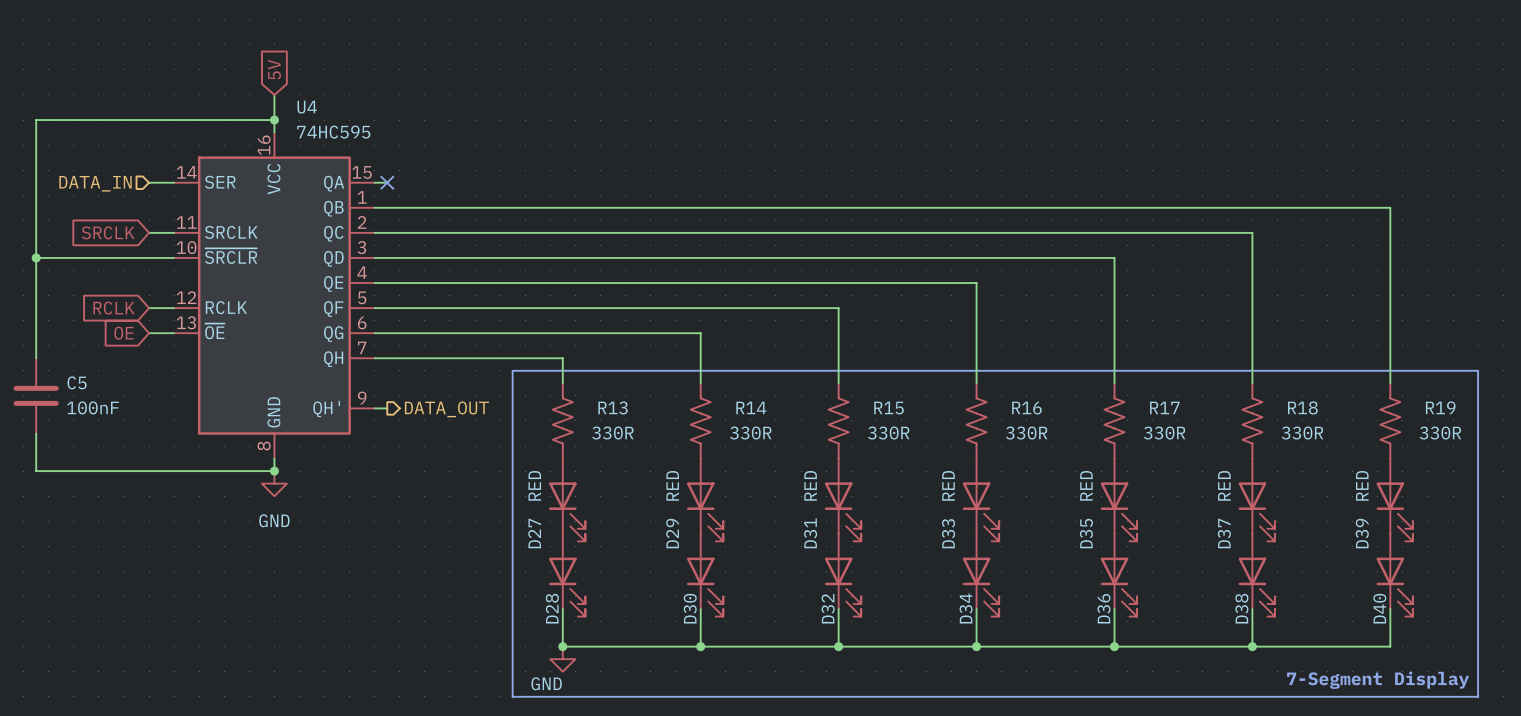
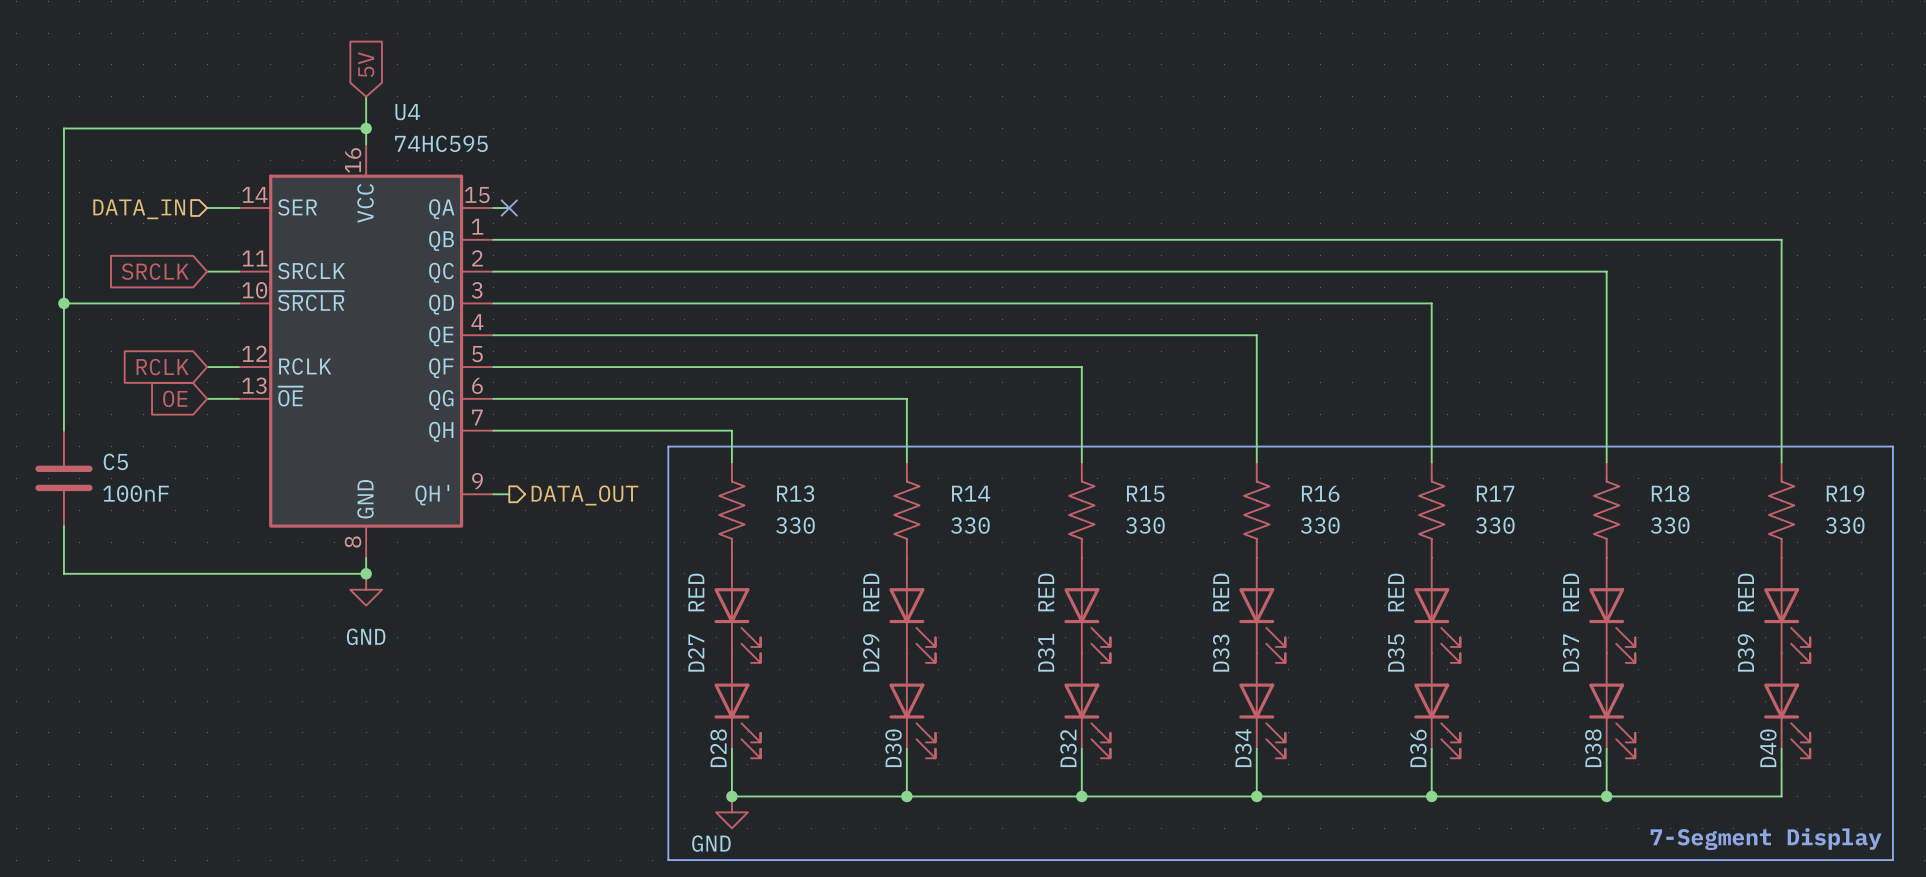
R13 value: 330R (612, 433) -> 330 (795, 525)
R14 value: 330R (750, 433) -> 330 (970, 525)
R15 value: 330R (888, 433) -> 330 (1145, 525)
R16 value: 330R (1026, 433) -> 330 (1320, 525)
R17 value: 330R (1164, 433) -> 330 (1495, 525)
R18 value: 330R (1302, 433) -> 330 (1670, 525)
R19 value: 330R (1440, 433) -> 330 (1845, 525)

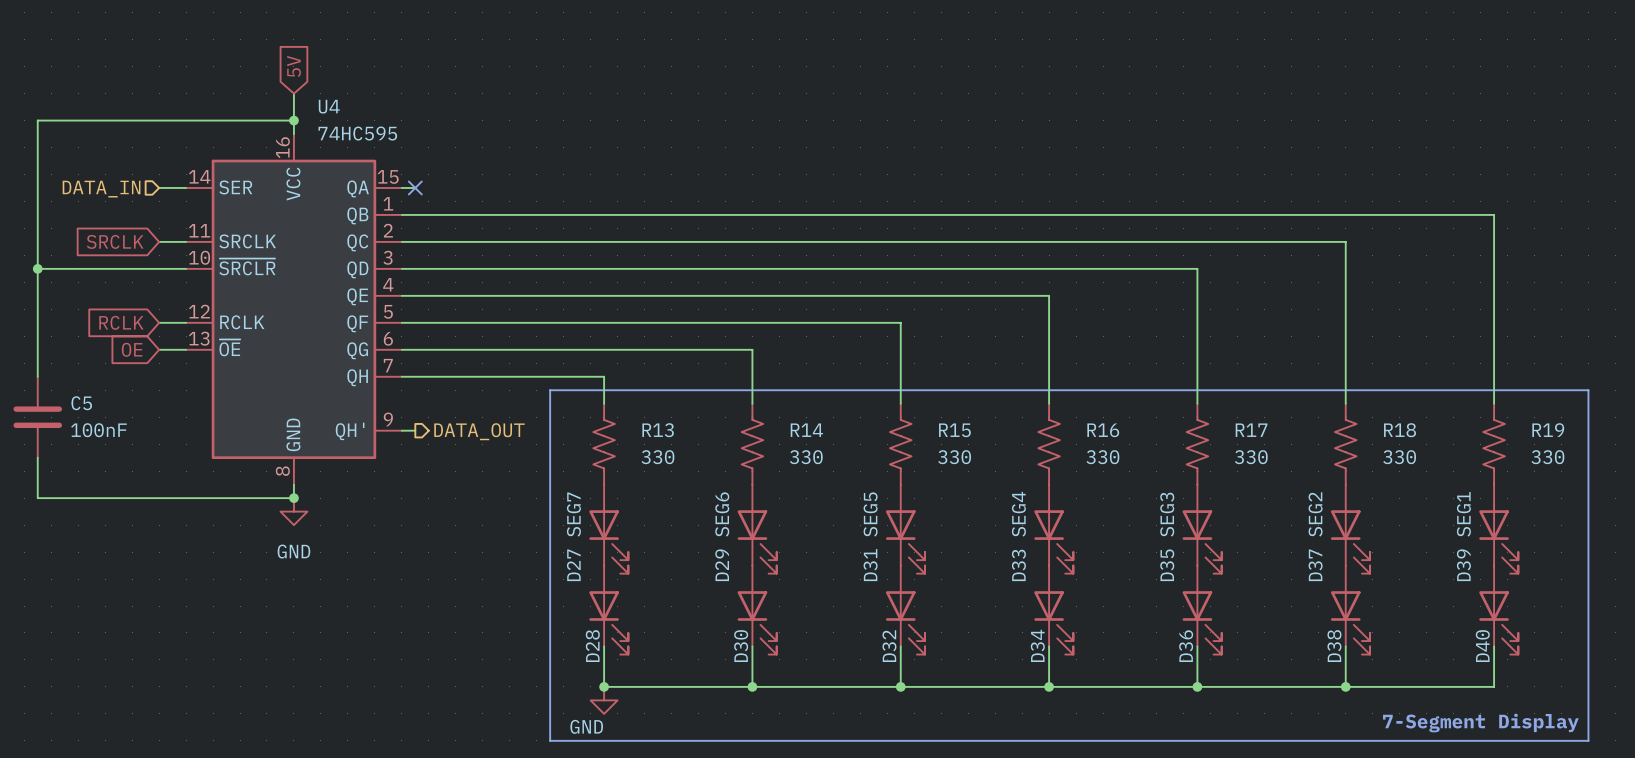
D27 value: RED (696, 592) -> SEG7 (573, 514)
D29 value: RED (871, 592) -> SEG6 (722, 514)
D31 value: RED (1046, 592) -> SEG5 (870, 514)
D33 value: RED (1221, 592) -> SEG4 (1018, 514)
D35 value: RED (1396, 592) -> SEG3 (1167, 514)
D37 value: RED (1571, 592) -> SEG2 (1315, 514)
D39 value: RED (1746, 592) -> SEG1 (1463, 514)

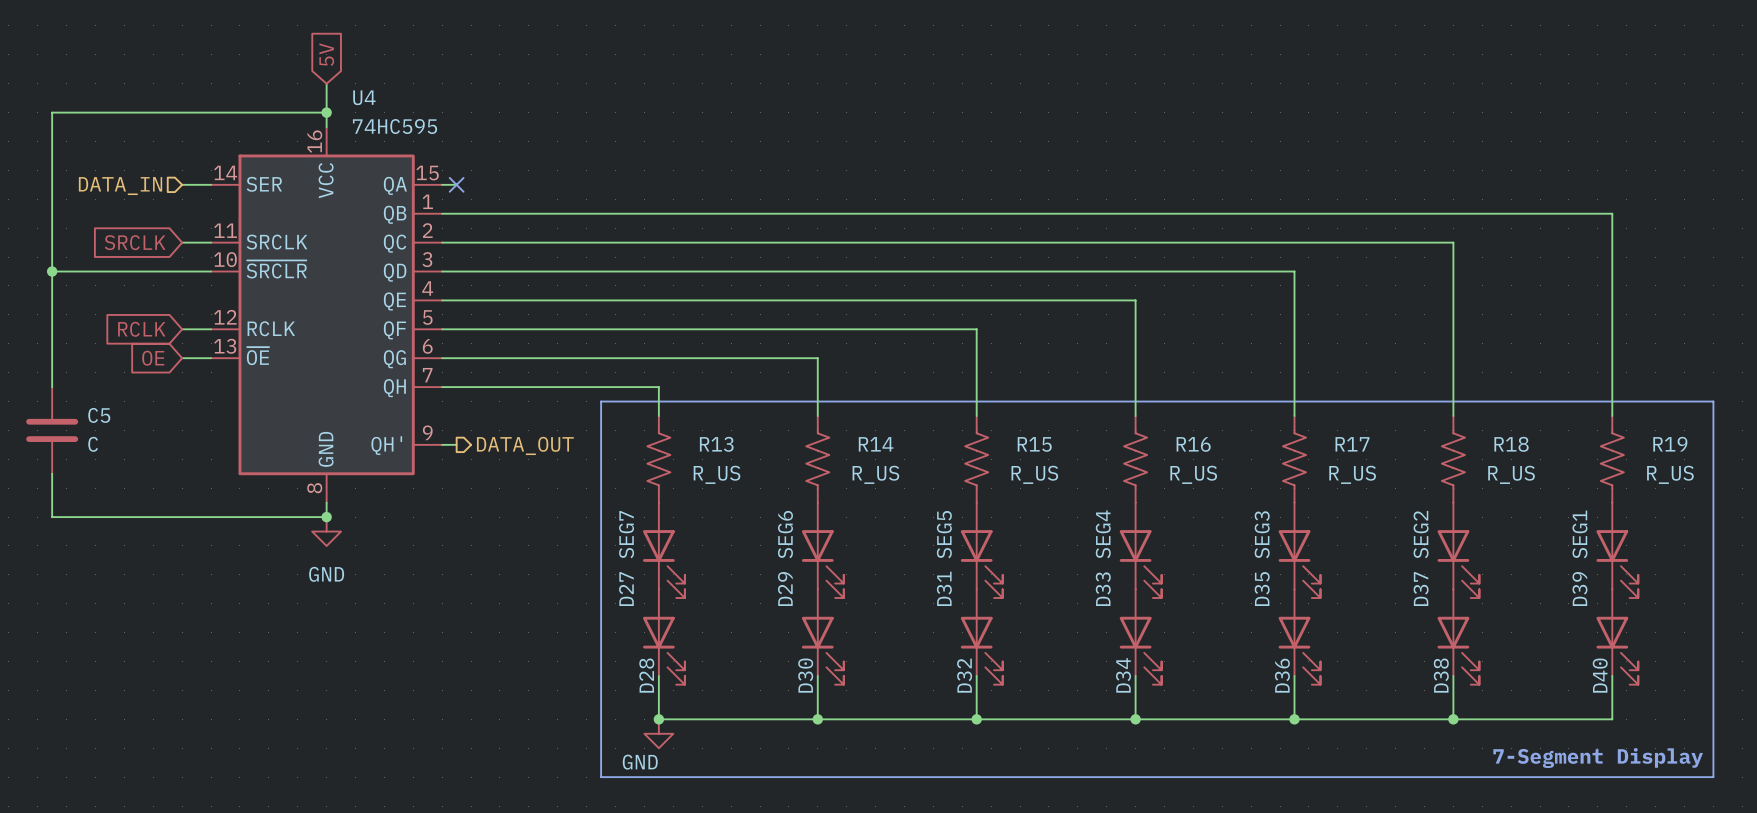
C5 value: 100nF (98, 430) -> C (93, 444)
R13 value: 330 (657, 457) -> R_US (716, 474)
R14 value: 330 (806, 457) -> R_US (875, 474)
R15 value: 330 (954, 457) -> R_US (1034, 474)
R16 value: 330 (1102, 457) -> R_US (1193, 474)
R17 value: 330 (1251, 457) -> R_US (1352, 474)
R18 value: 330 (1399, 457) -> R_US (1511, 474)
R19 value: 330 (1547, 457) -> R_US (1670, 474)

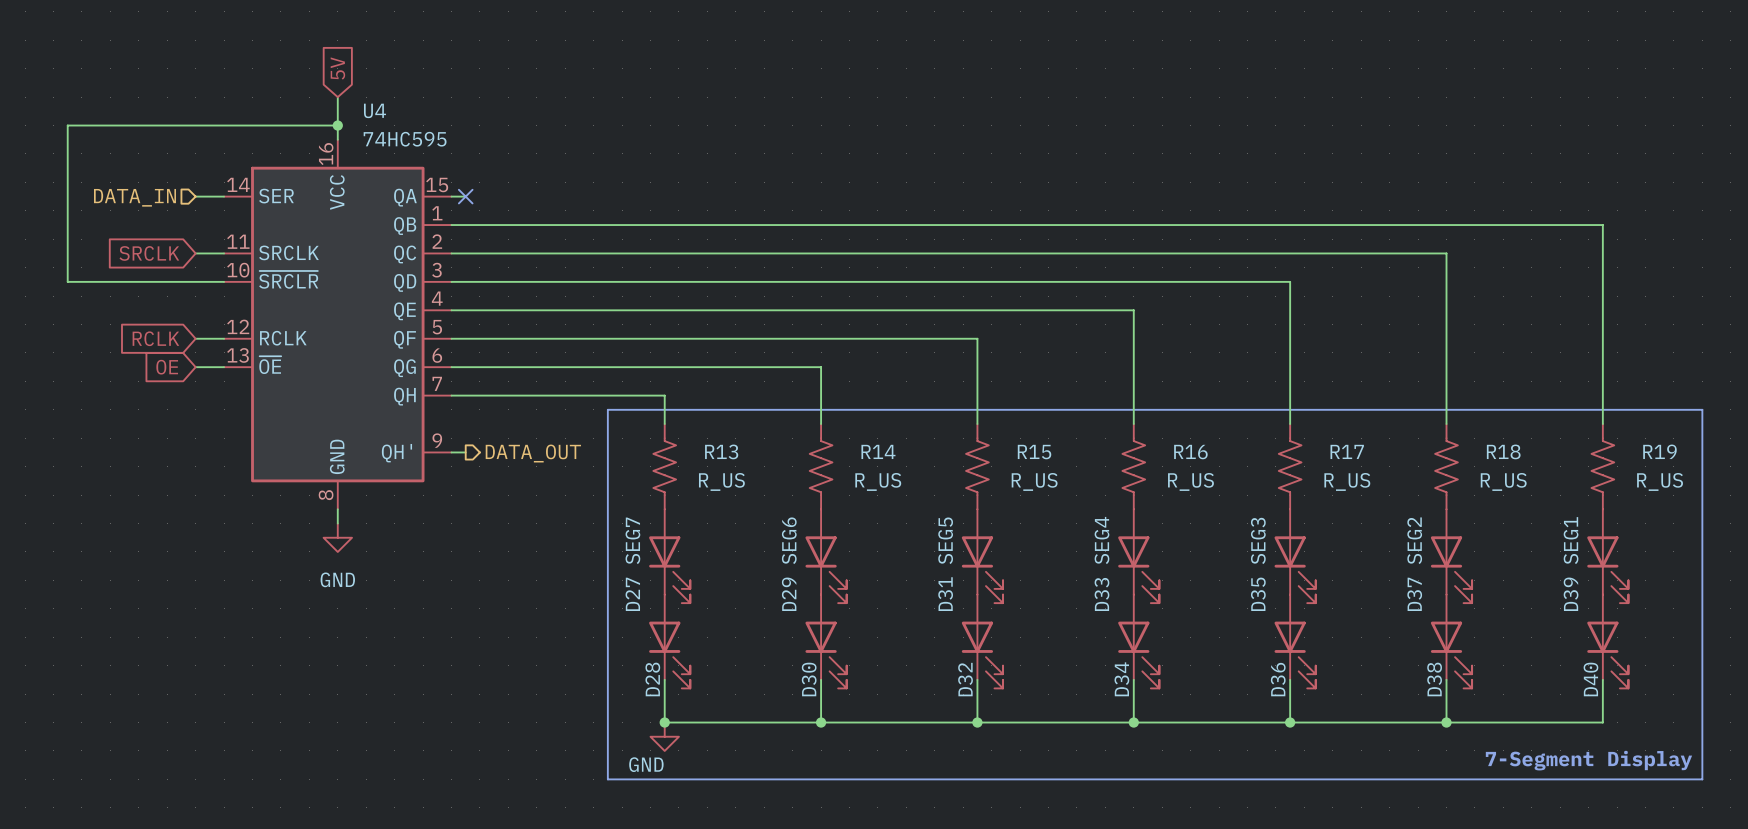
wire: (52, 271) (52, 387) -> none
junction: (52, 271) -> none
C5: C (52, 430) -> none
wire: (52, 473) (52, 517) (326, 517) -> none
junction: (326, 517) -> none

